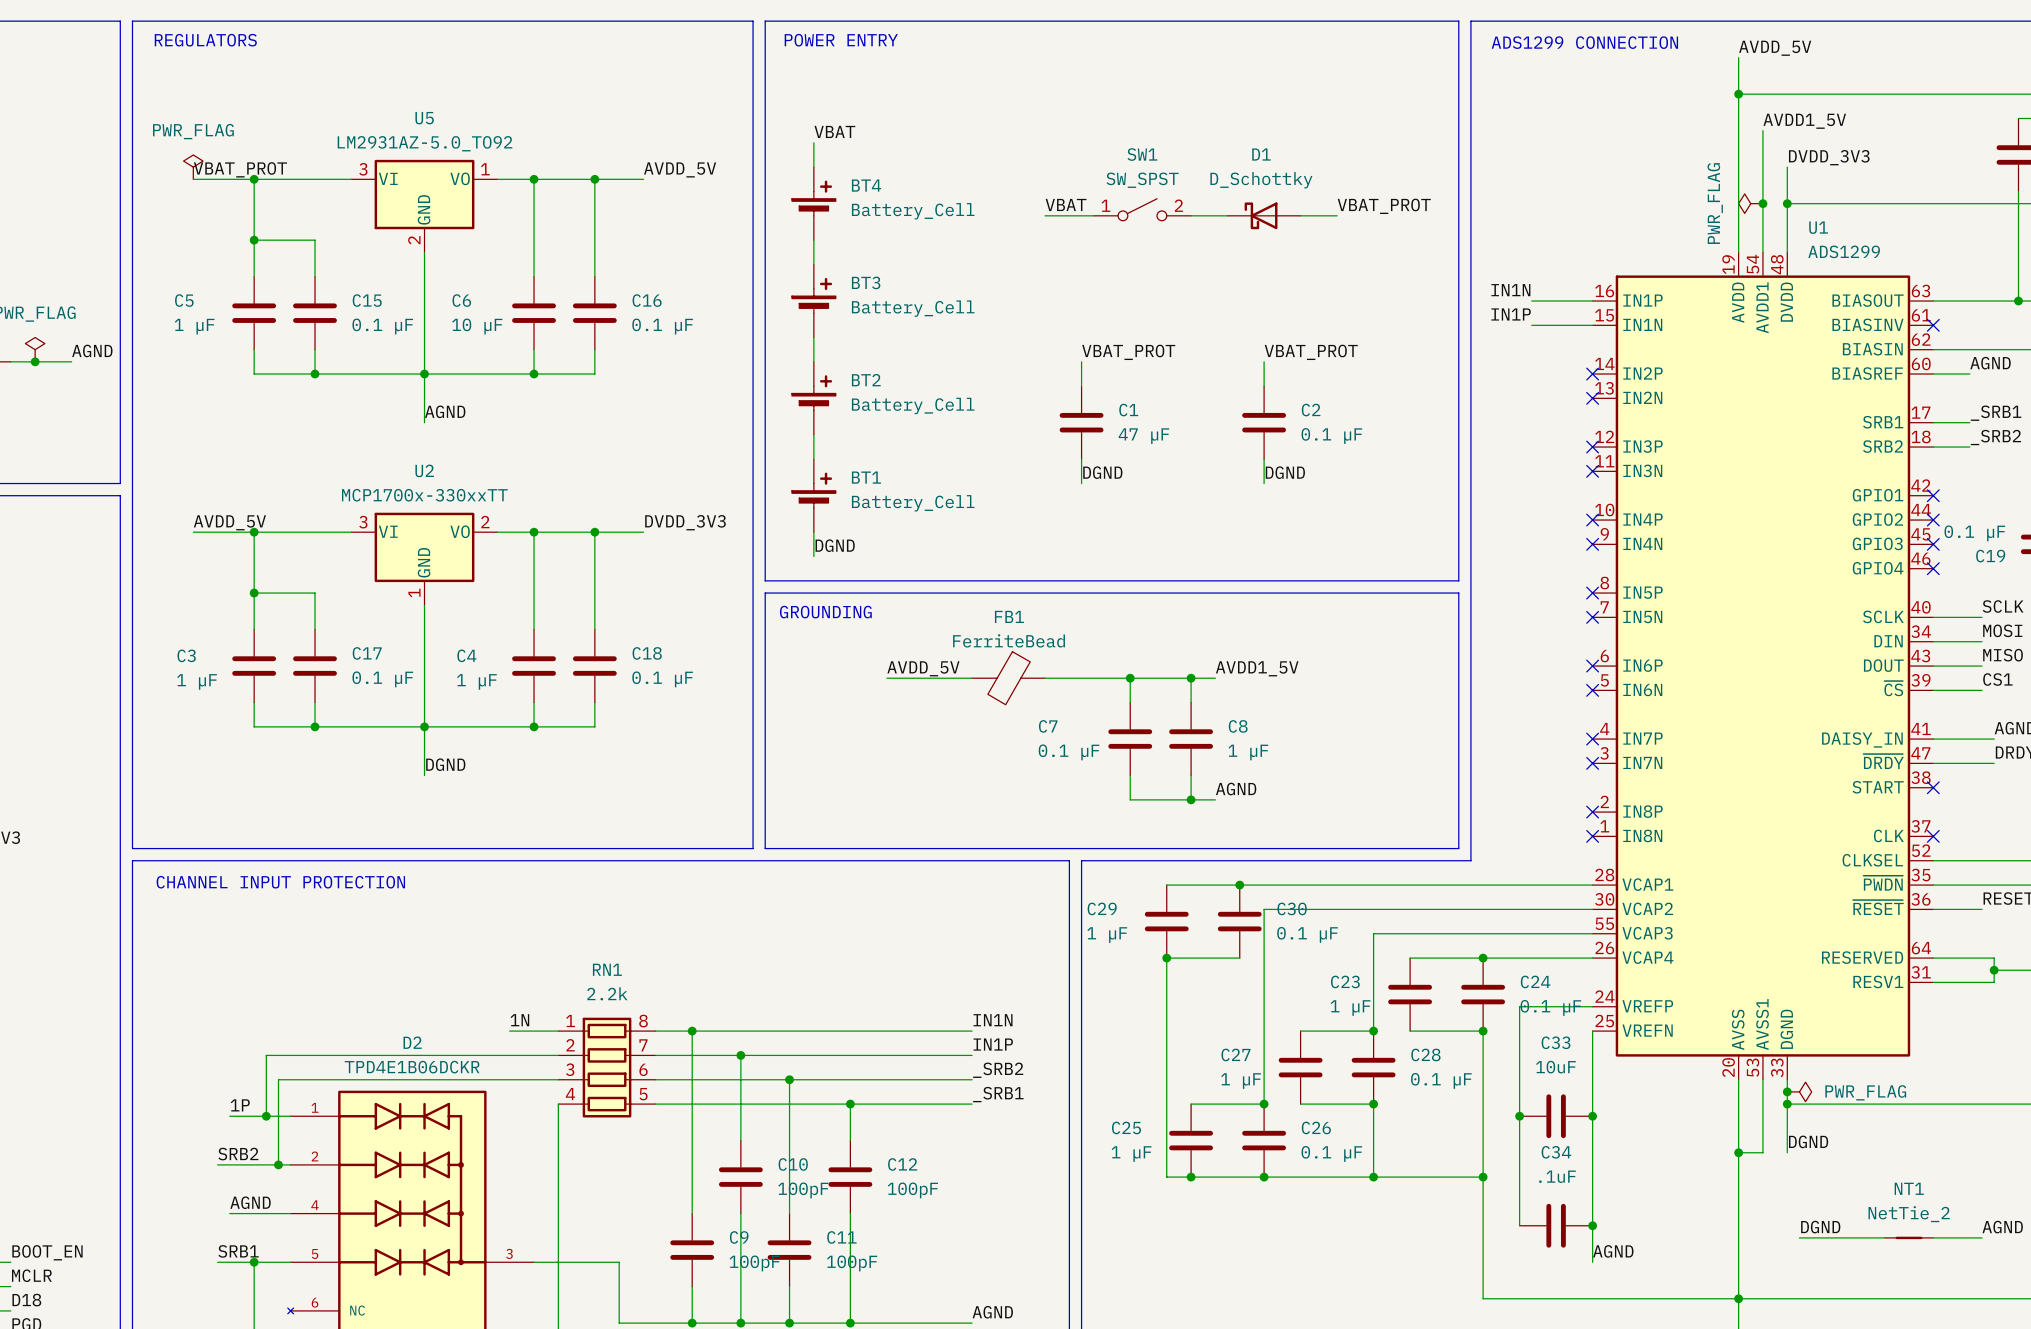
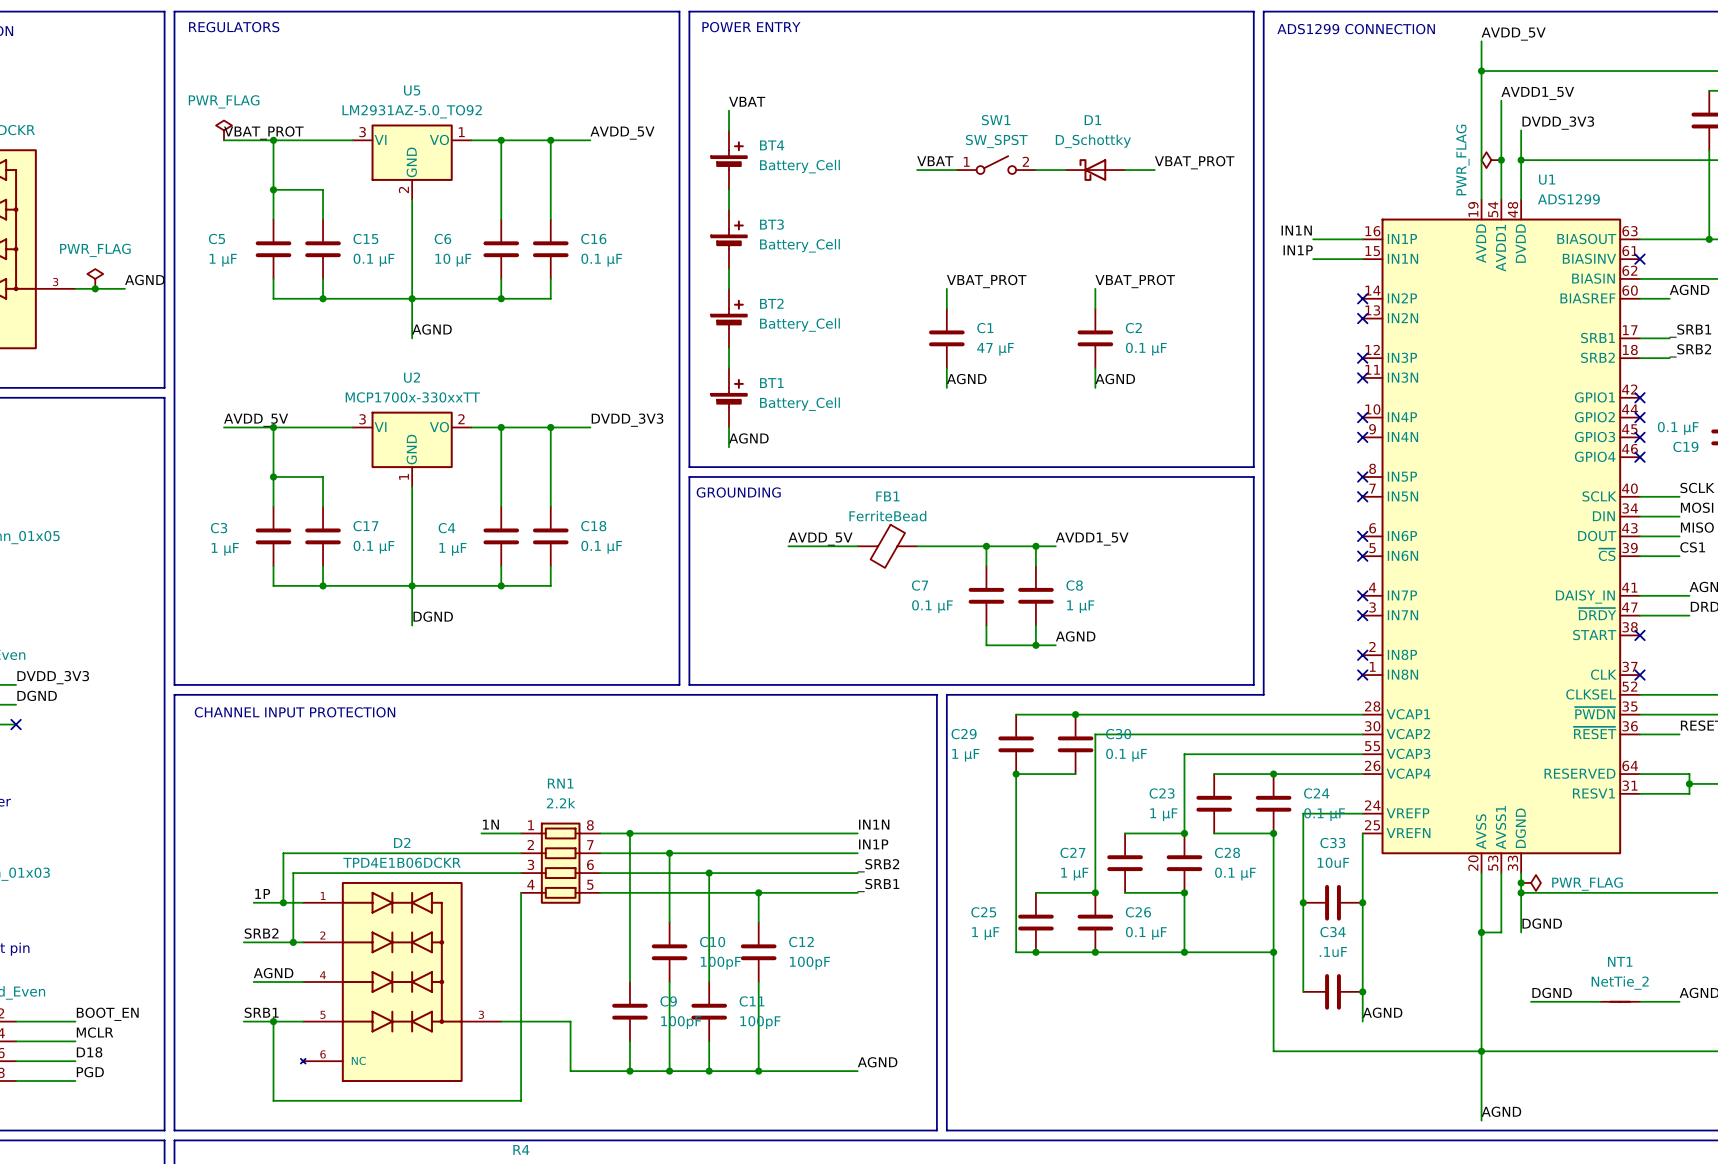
label: DGND (1102, 472) -> AGND (966, 379)
label: DGND (1285, 472) -> AGND (1115, 379)
label: DGND (835, 545) -> AGND (748, 438)

